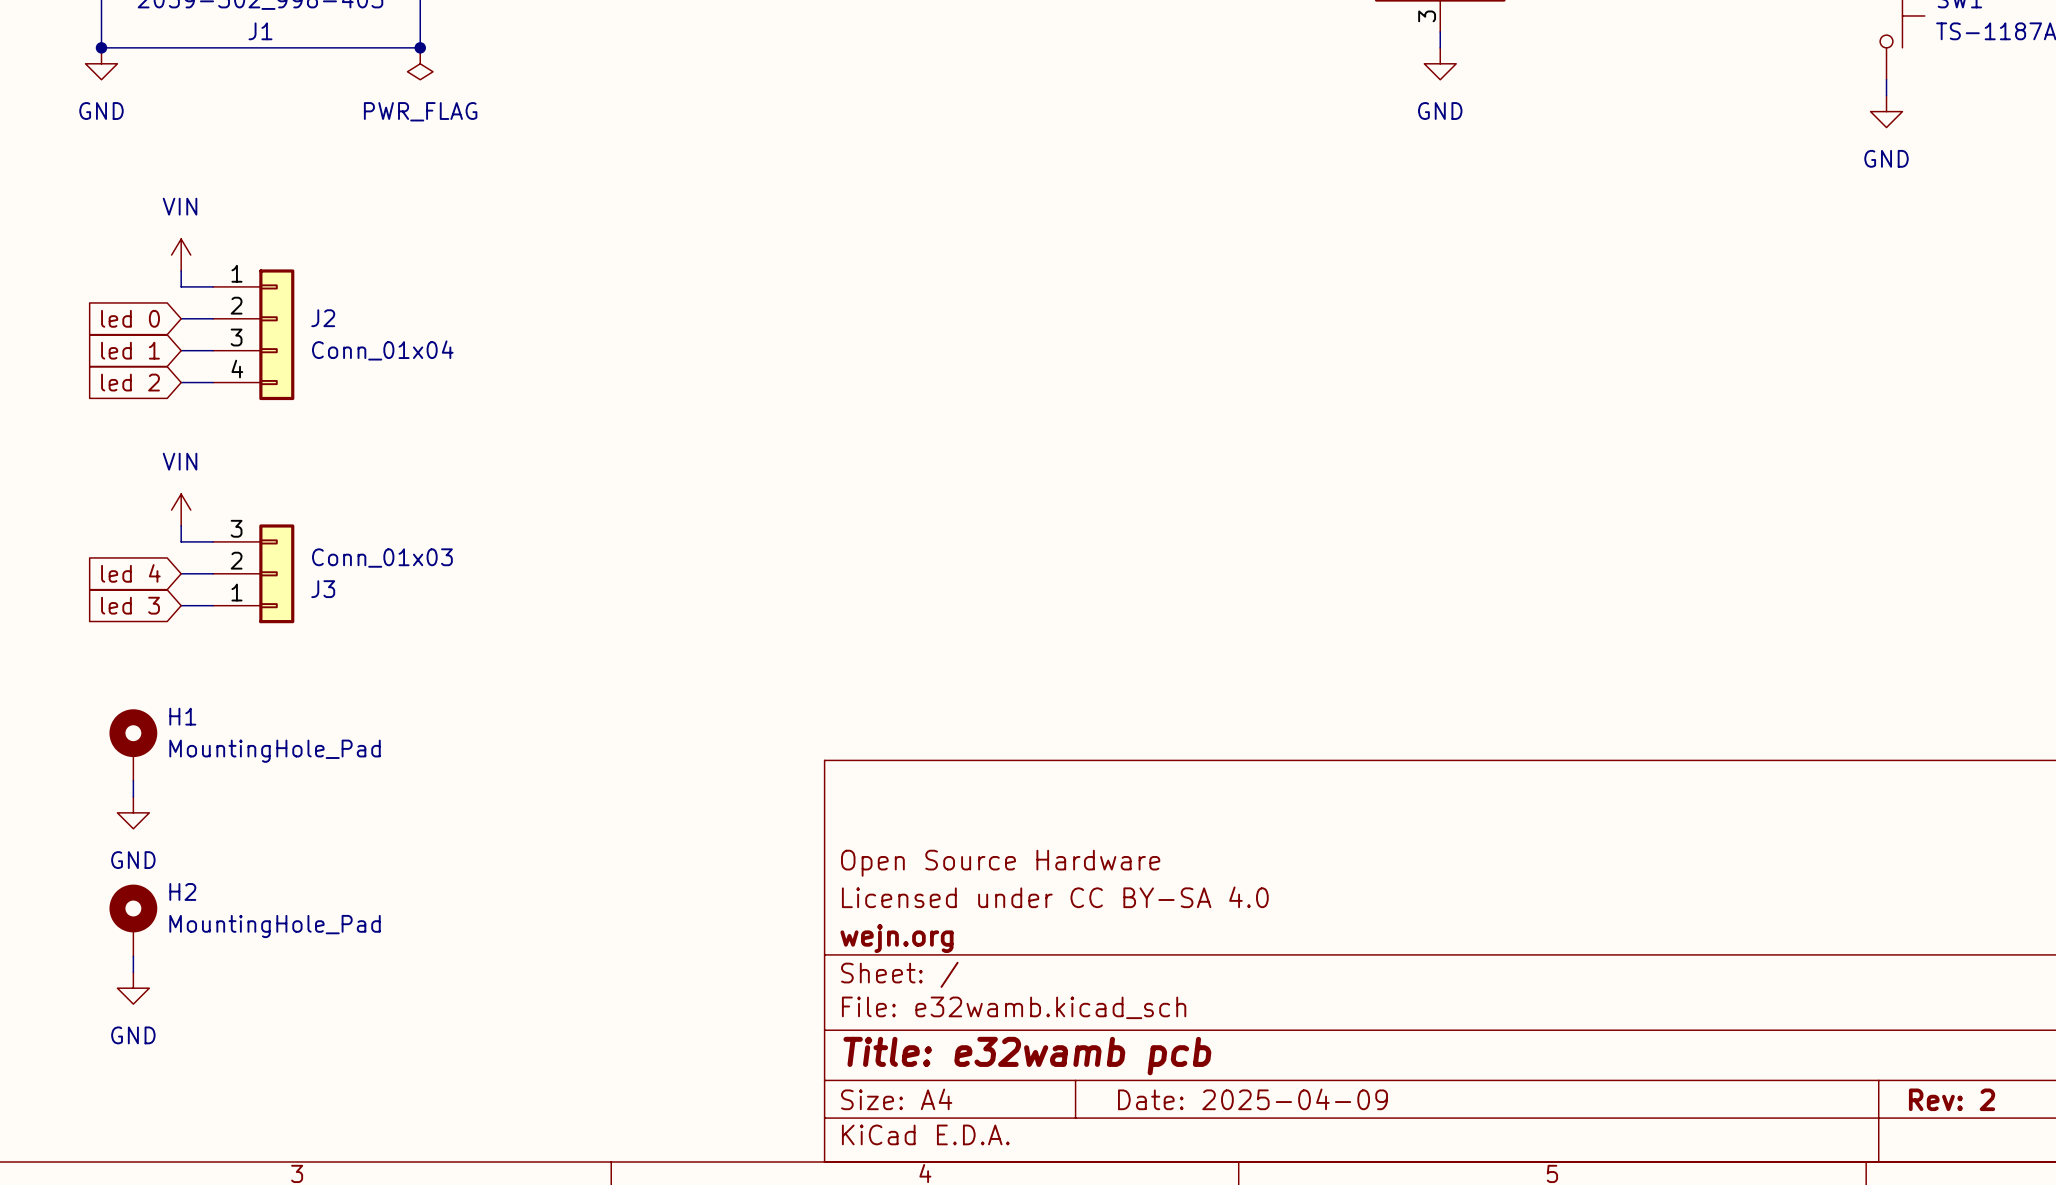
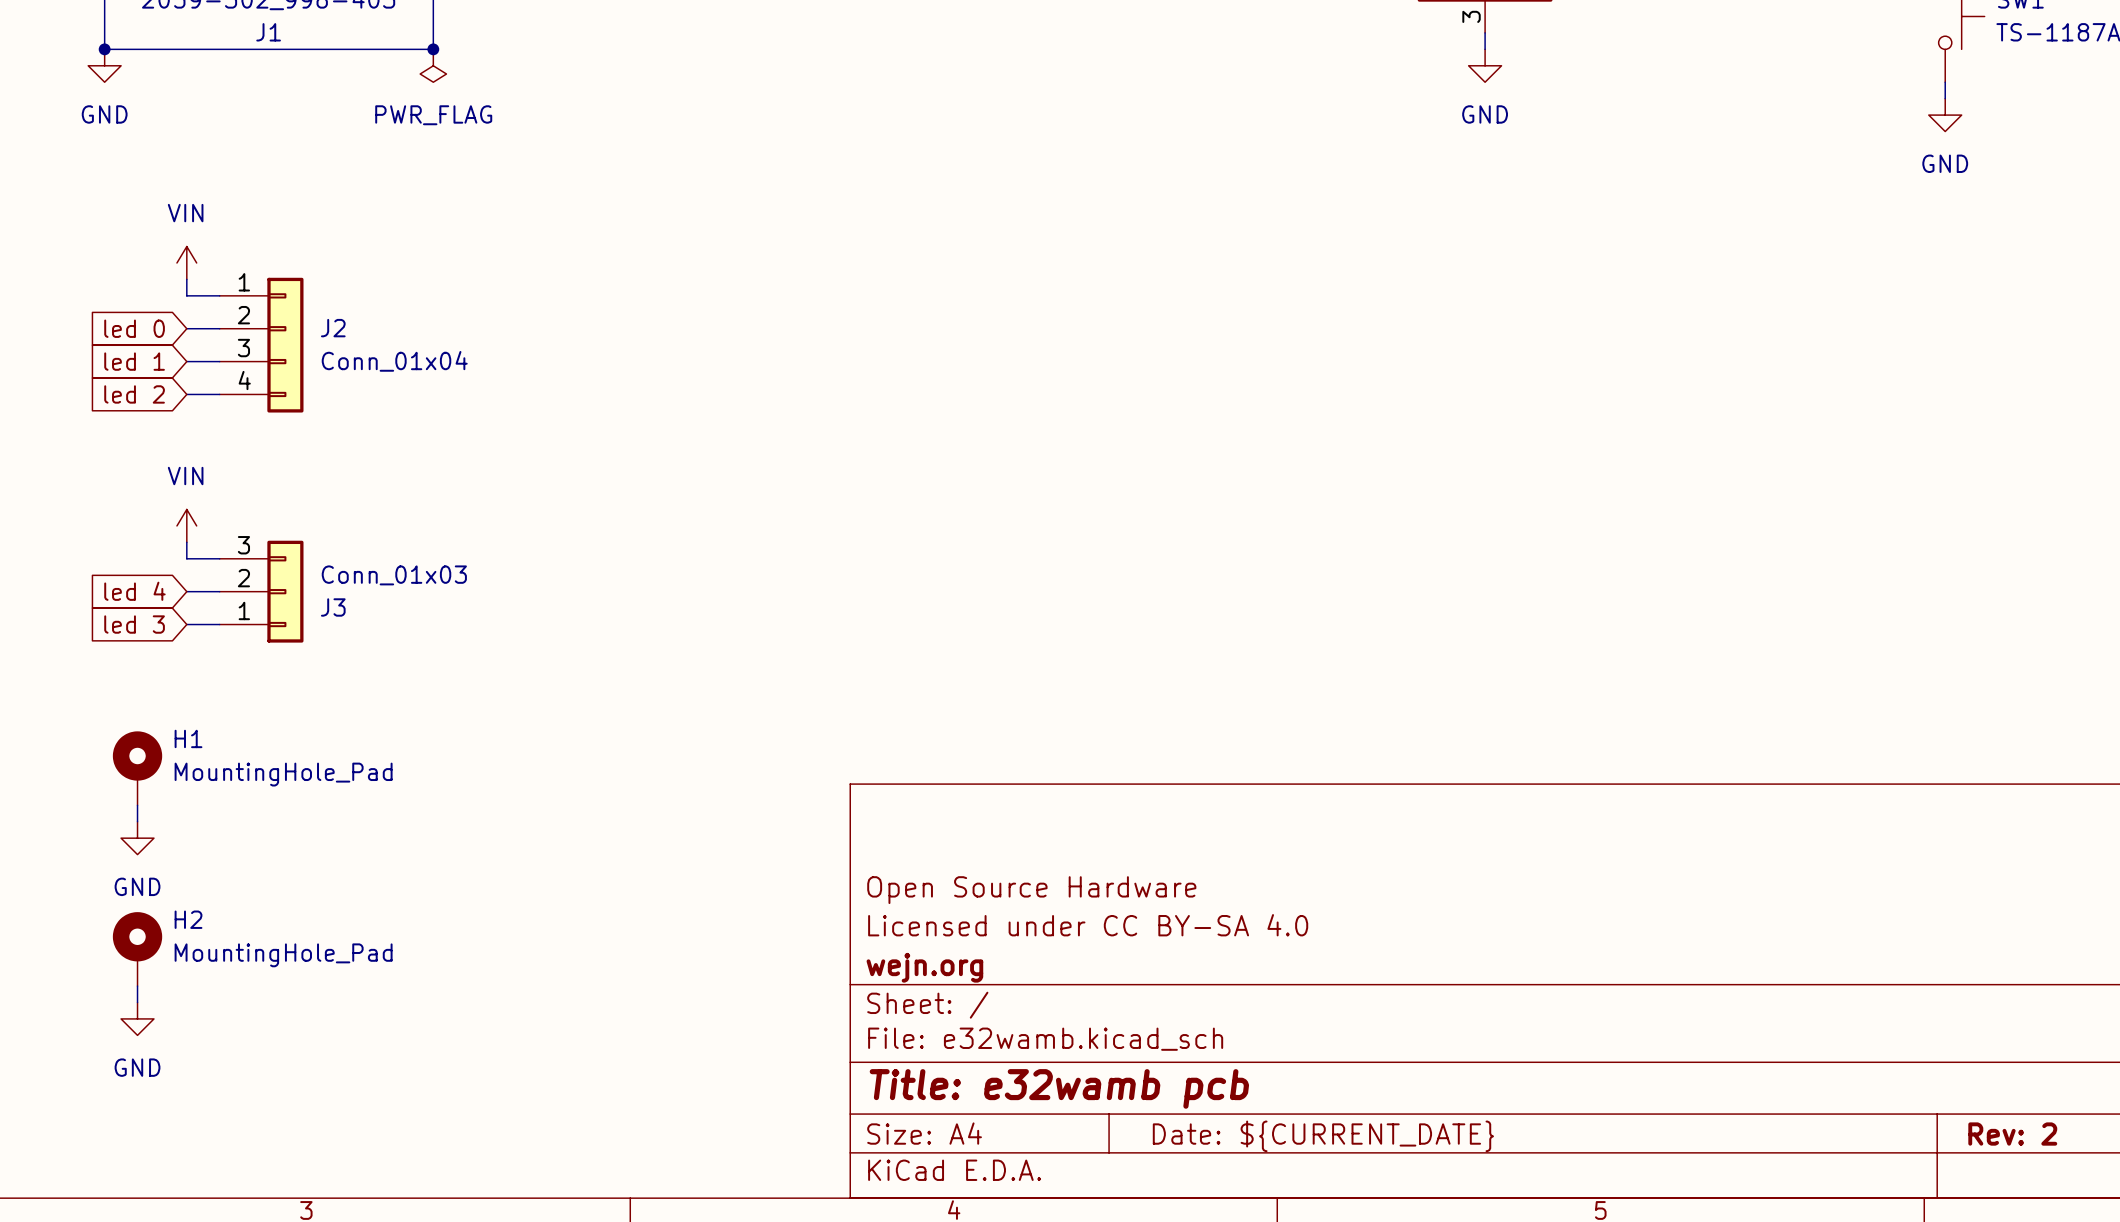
title block: Date: 2025-04-09 (1252, 1099) -> Date: ${CURRENT_DATE} (1323, 1136)

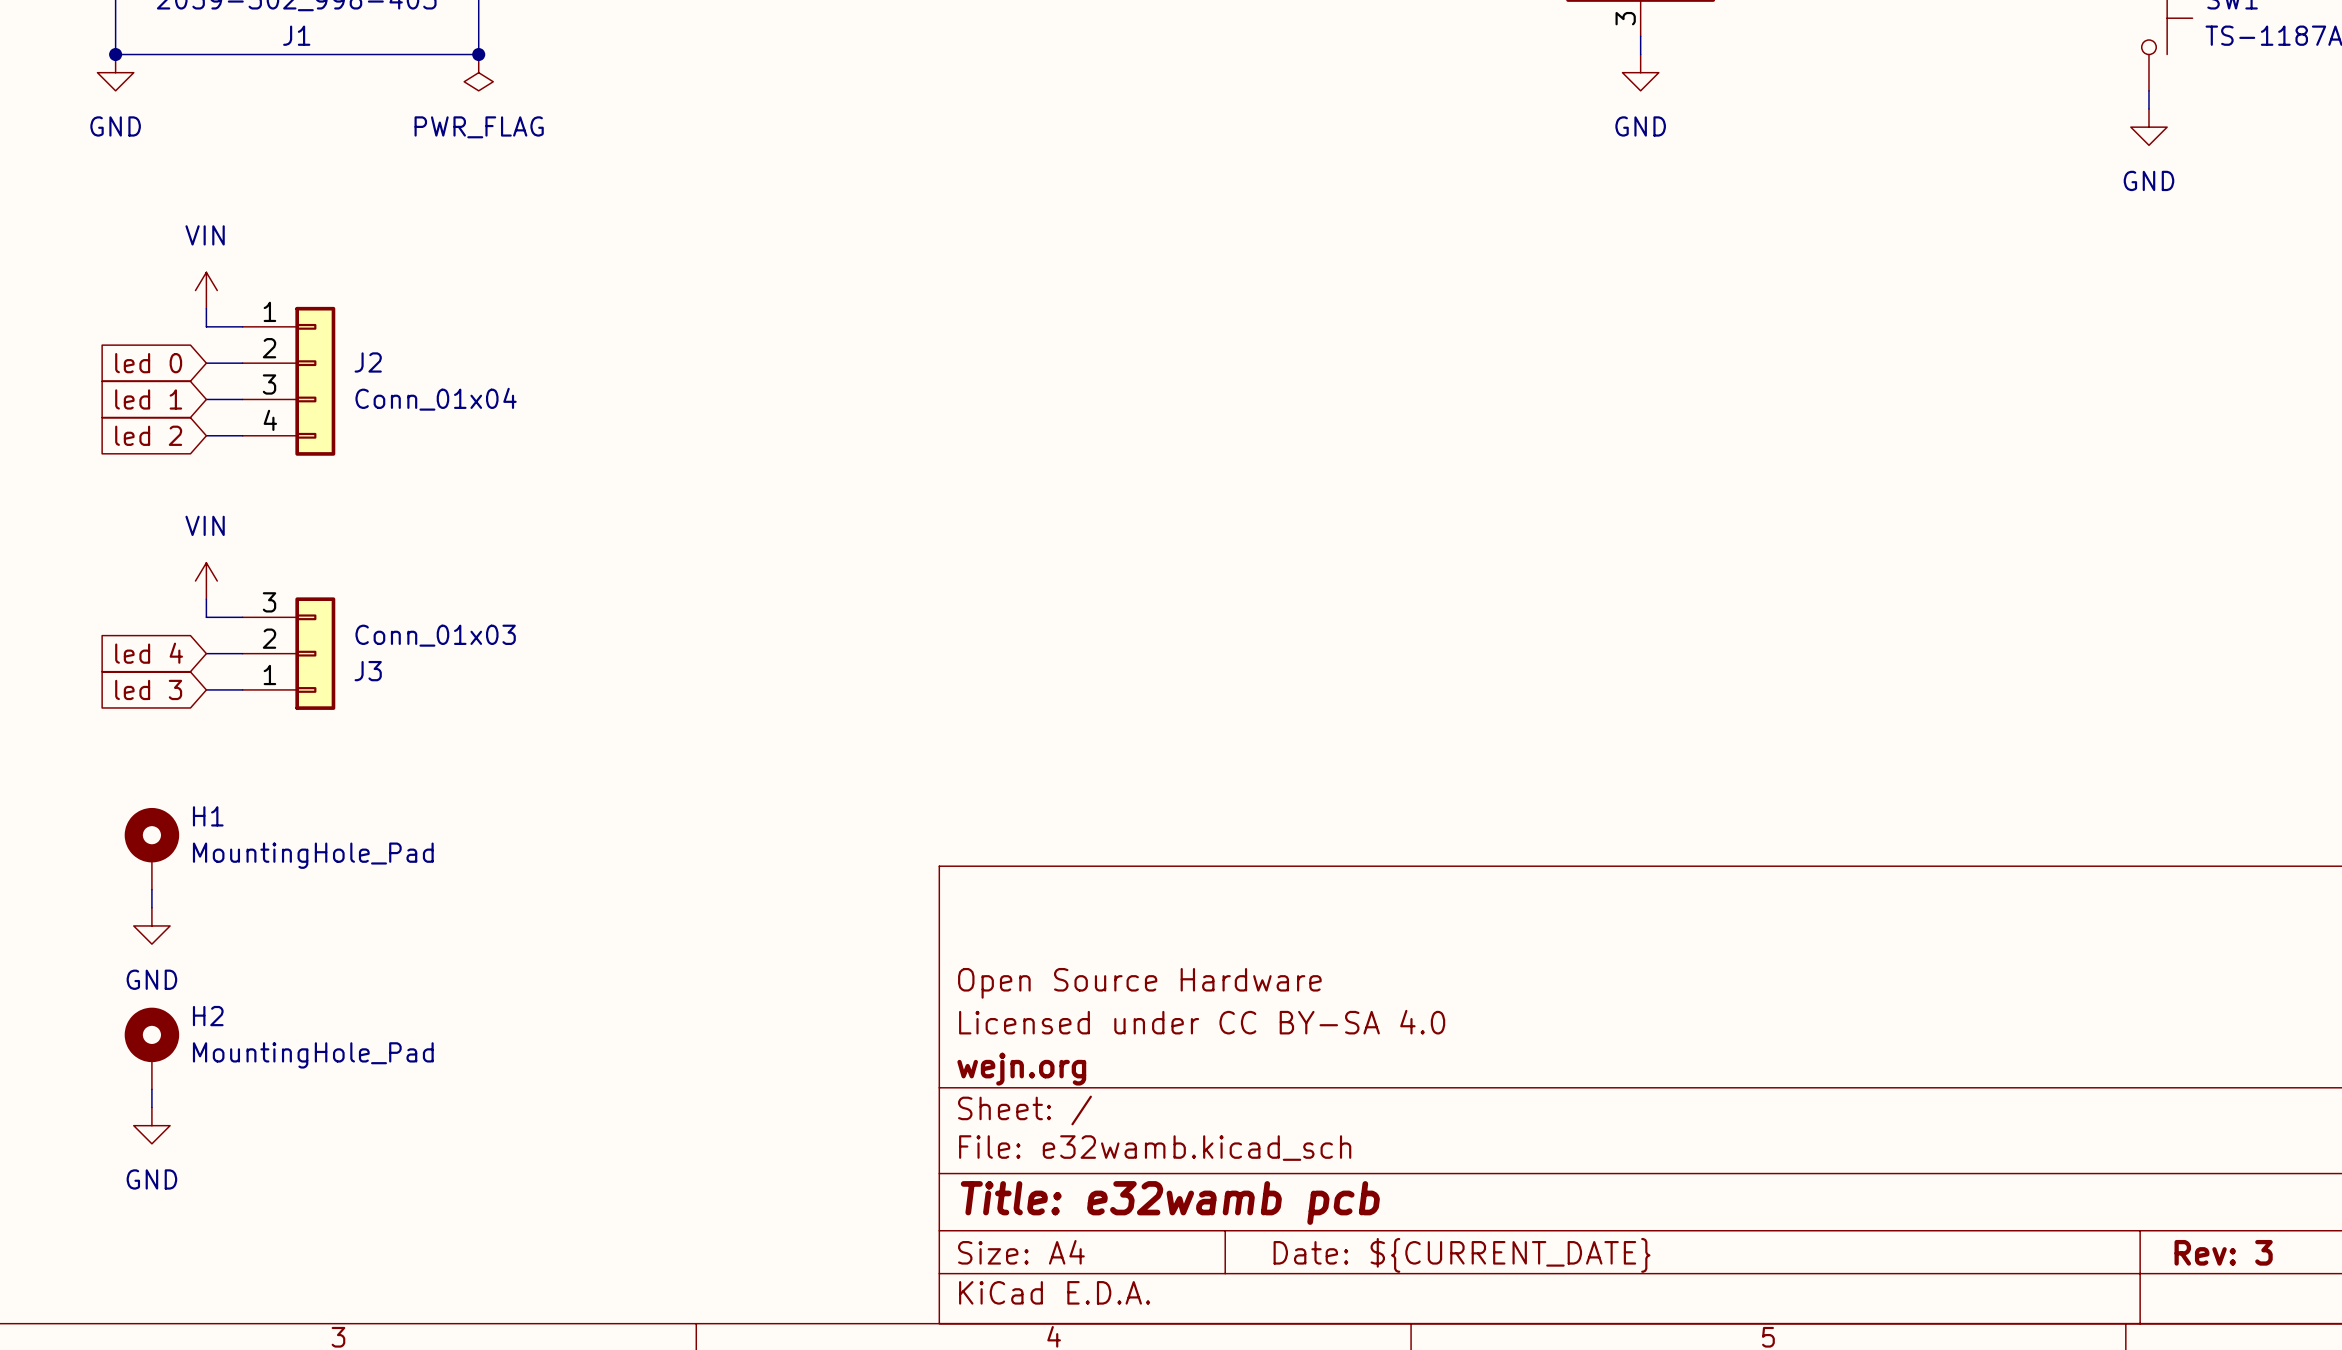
title block: Rev: 2 (2012, 1134) -> Rev: 3 (2223, 1252)

